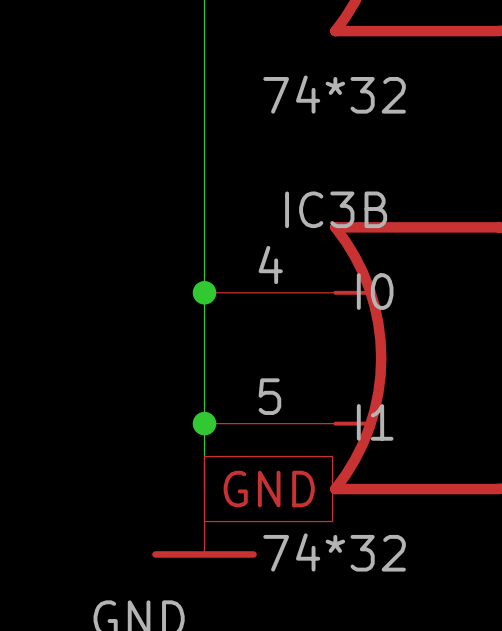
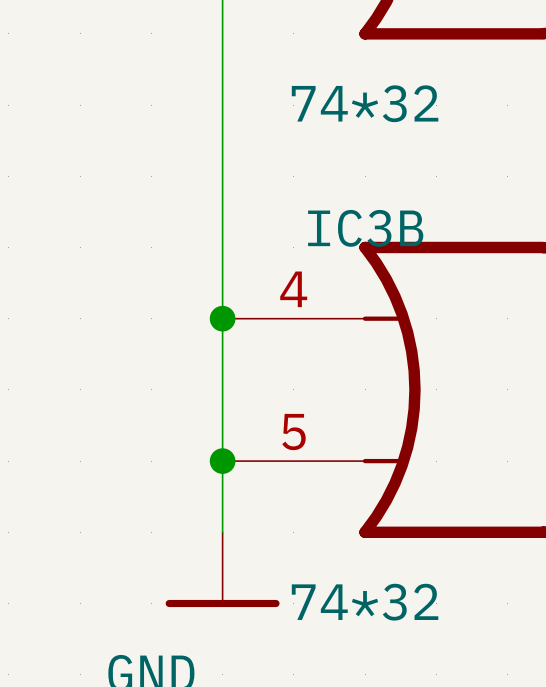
IC3B pin name: I0 (375, 291) -> none
IC3B pin name: I1 (375, 422) -> none
global label: GND (269, 489) -> none

